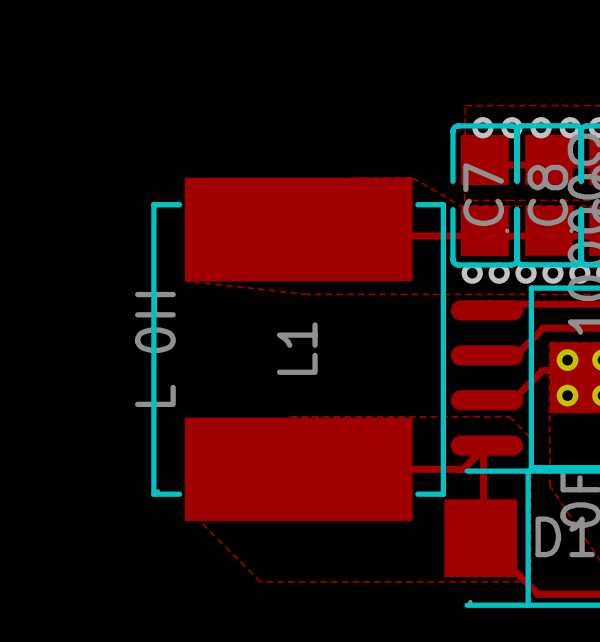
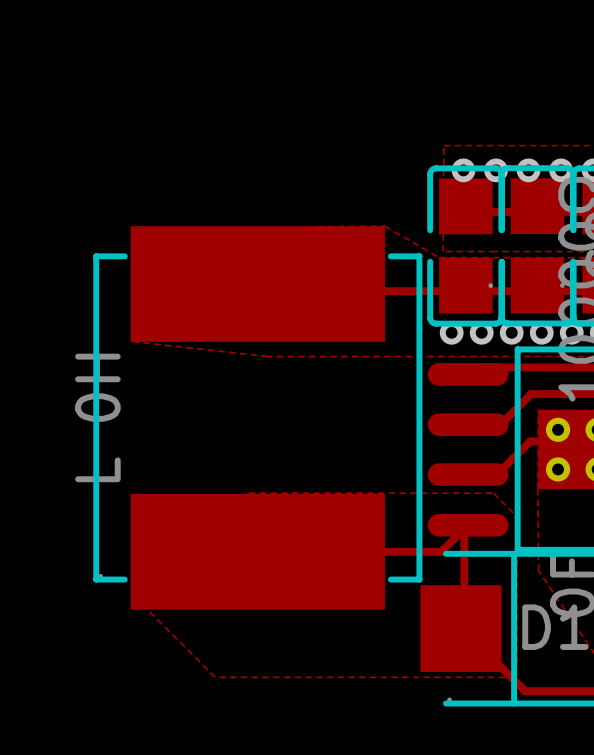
C7 name: C7 (483, 194) -> none
C8 name: C8 (547, 195) -> none
L1 name: L1 (297, 348) -> none

